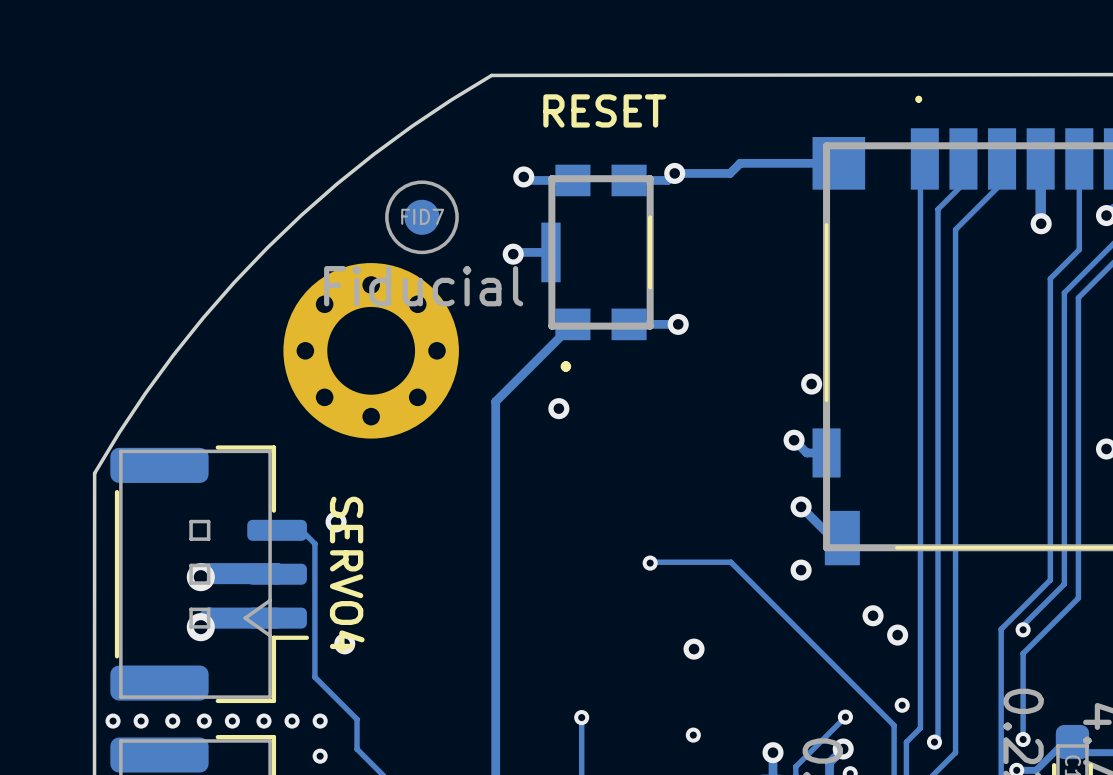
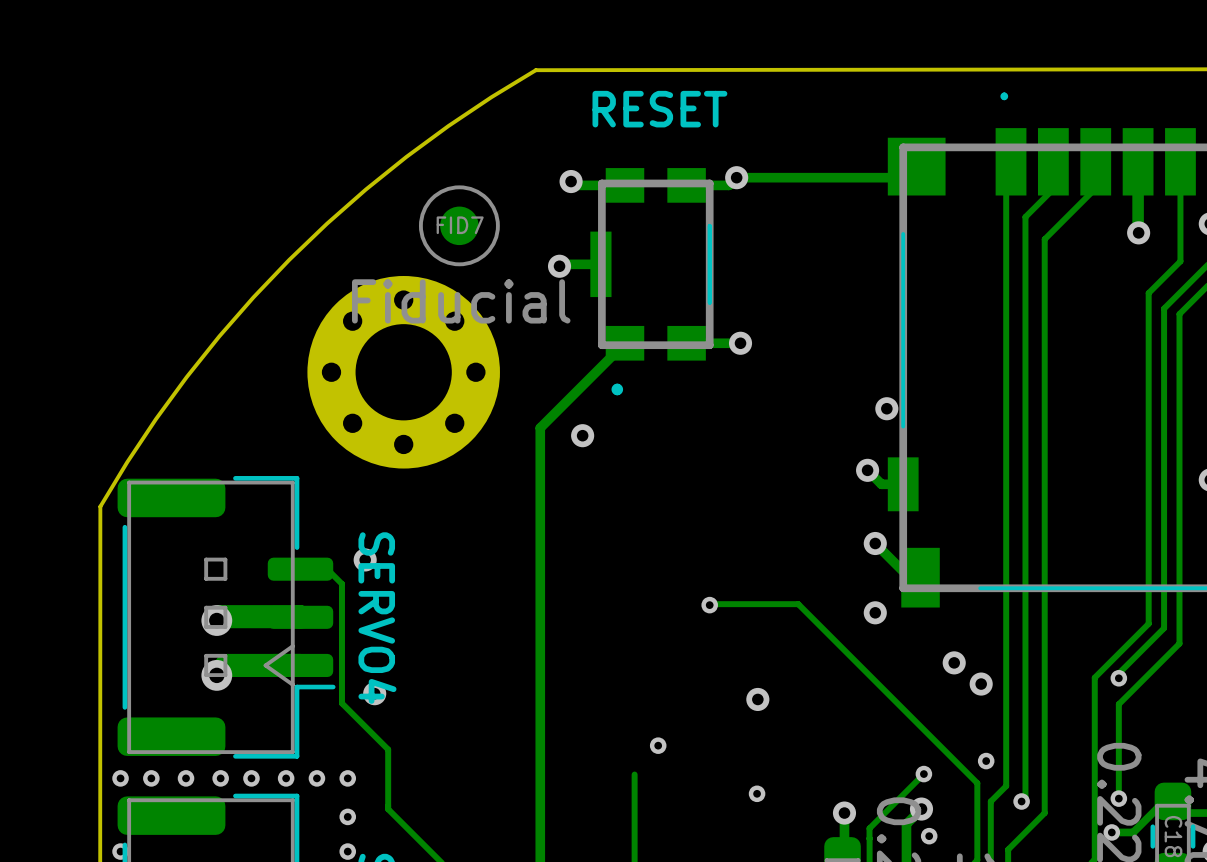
track: (838, 163) (740, 163) (730, 173) -> (905, 177) (797, 177)
via position: (558, 408) -> (582, 435)
track: (314, 652) (314, 677) (357, 719) -> (341, 703) (388, 749) (388, 776)
via position: (581, 717) -> (658, 745)

